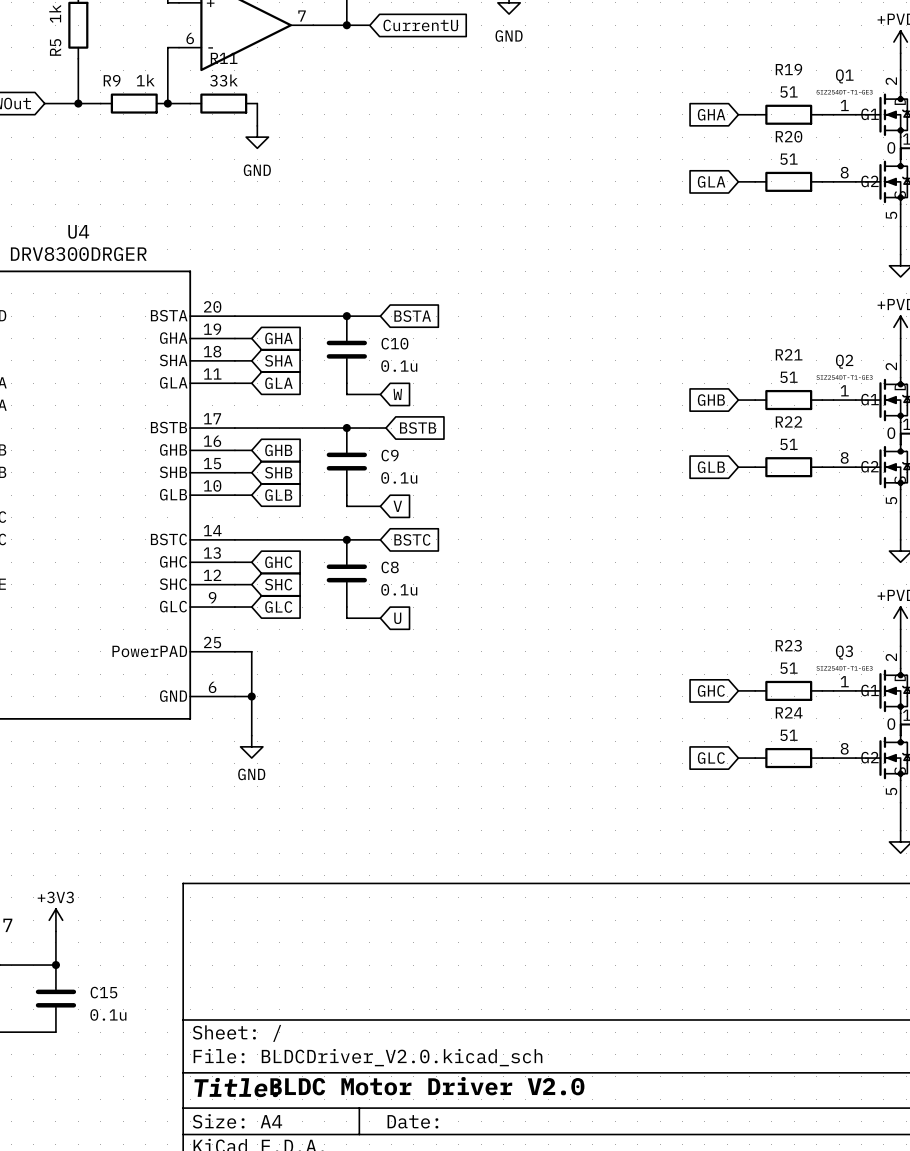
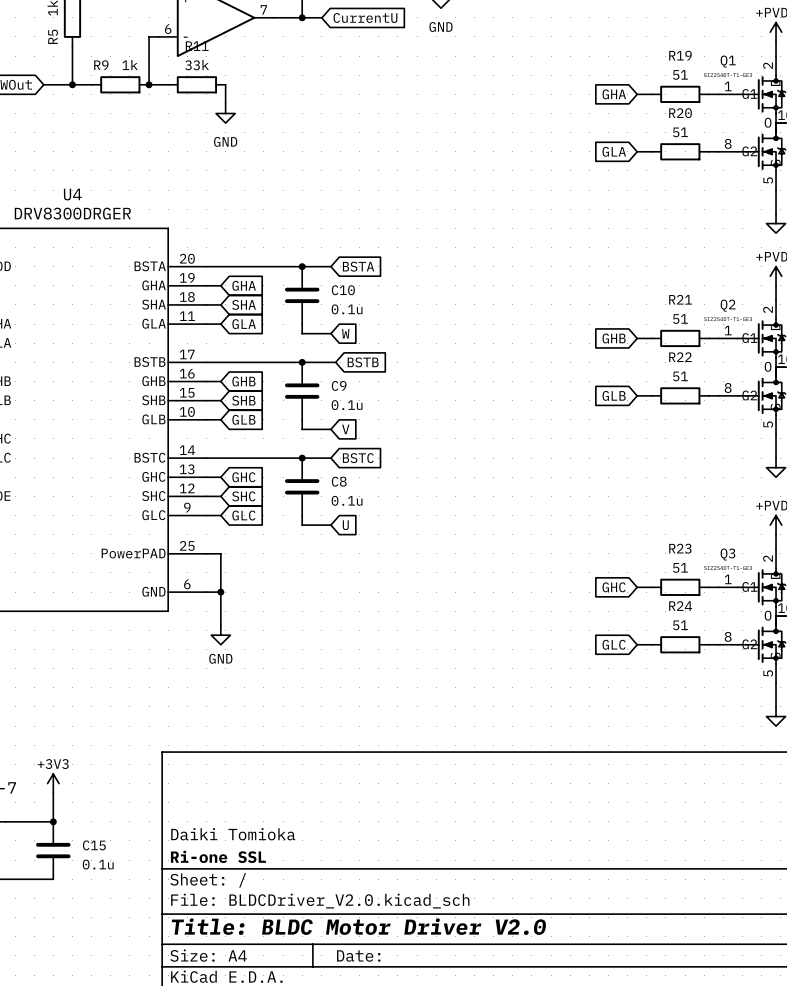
title block: none -> Daiki Tomioka (233, 834)
title block: none -> Ri-one SSL (218, 856)
text: BLDC Motor Driver V2.0 (427, 1086) -> none
title block: Title: (236, 1087) -> Title: BLDC Motor Driver V2.0 (359, 926)

